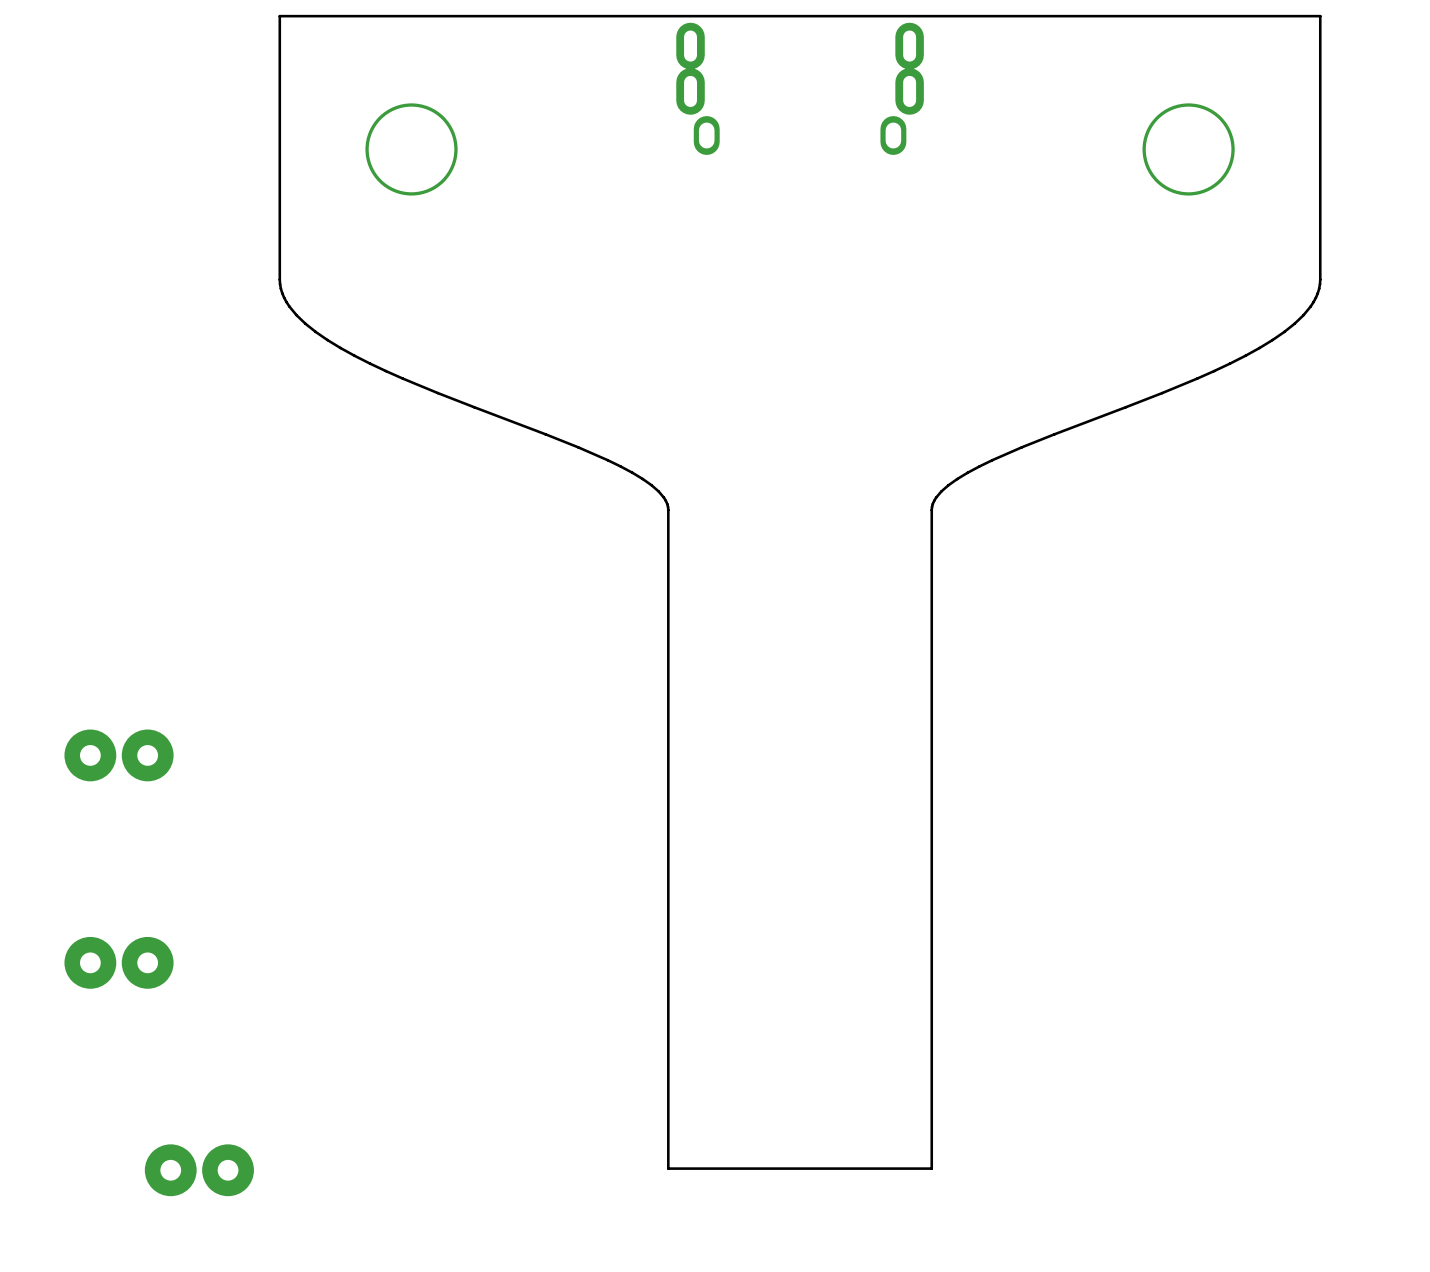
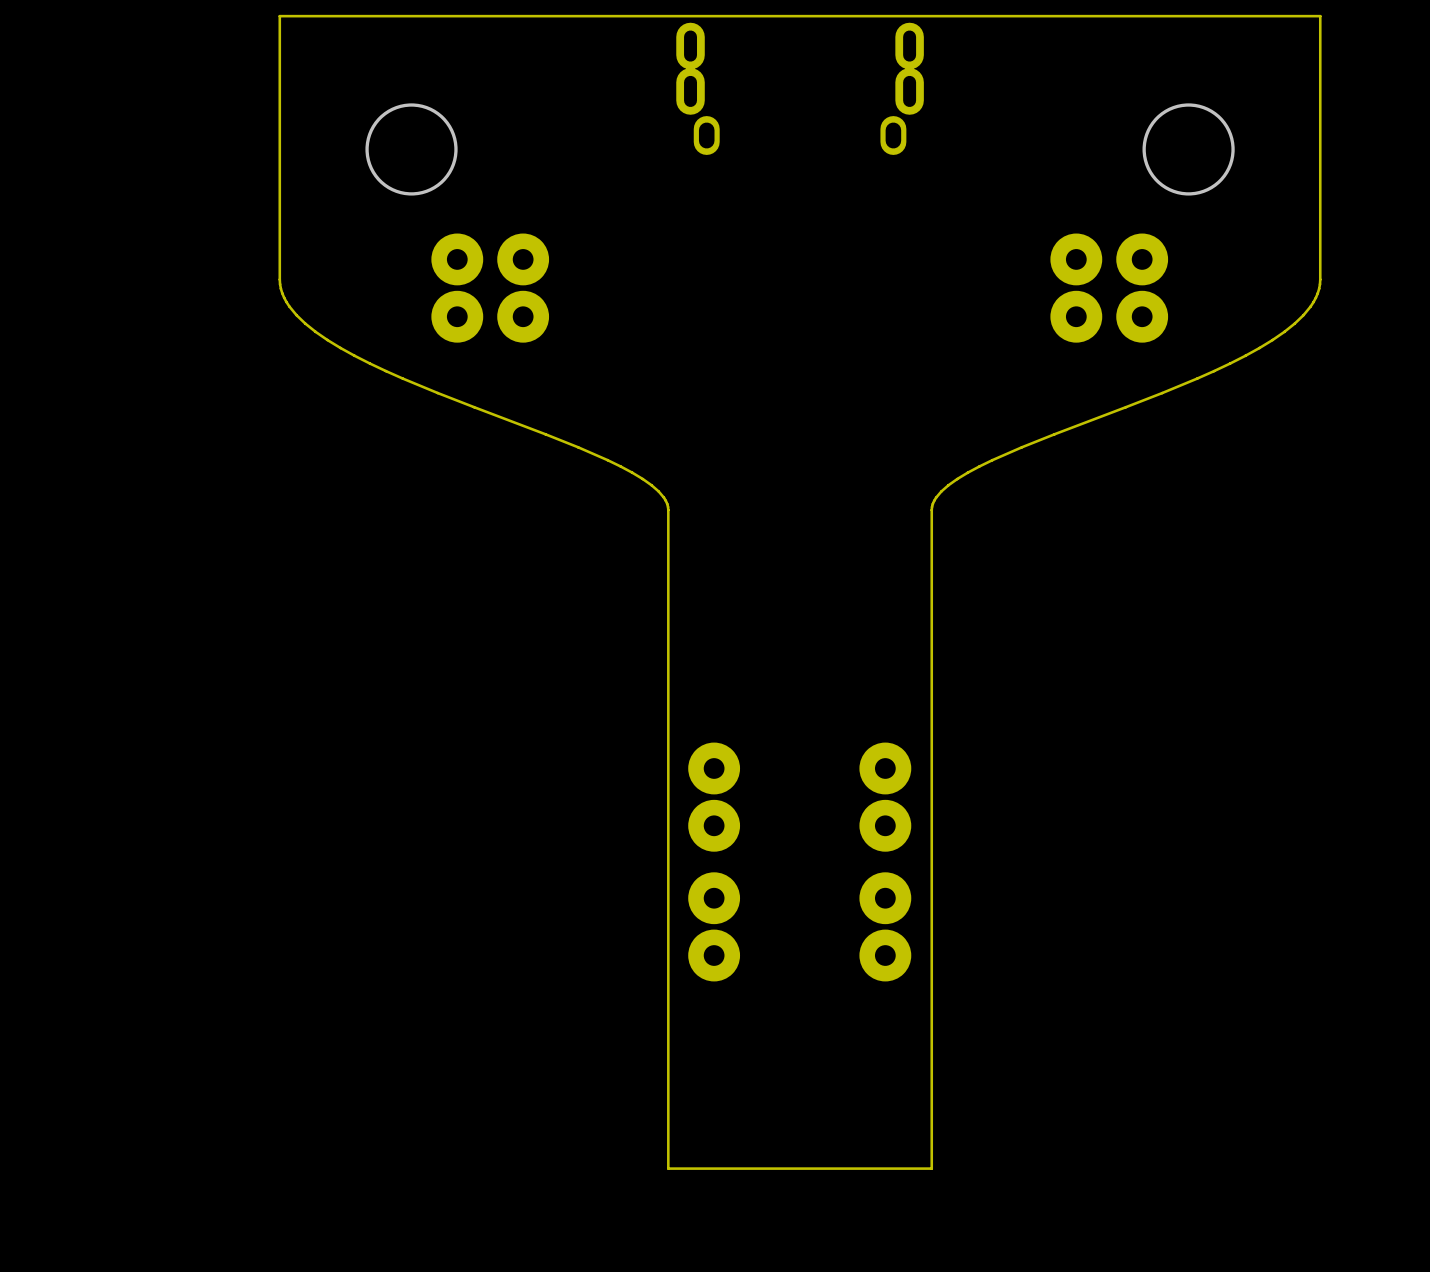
part: none -> (457, 288)
part: none -> (523, 288)
part: none -> (1076, 288)
part: none -> (1142, 288)
part: (119, 755) -> none
part: none -> (714, 797)
part: none -> (885, 797)
part: none -> (714, 926)
part: none -> (885, 926)
part: (119, 962) -> none
part: (199, 1170) -> none

